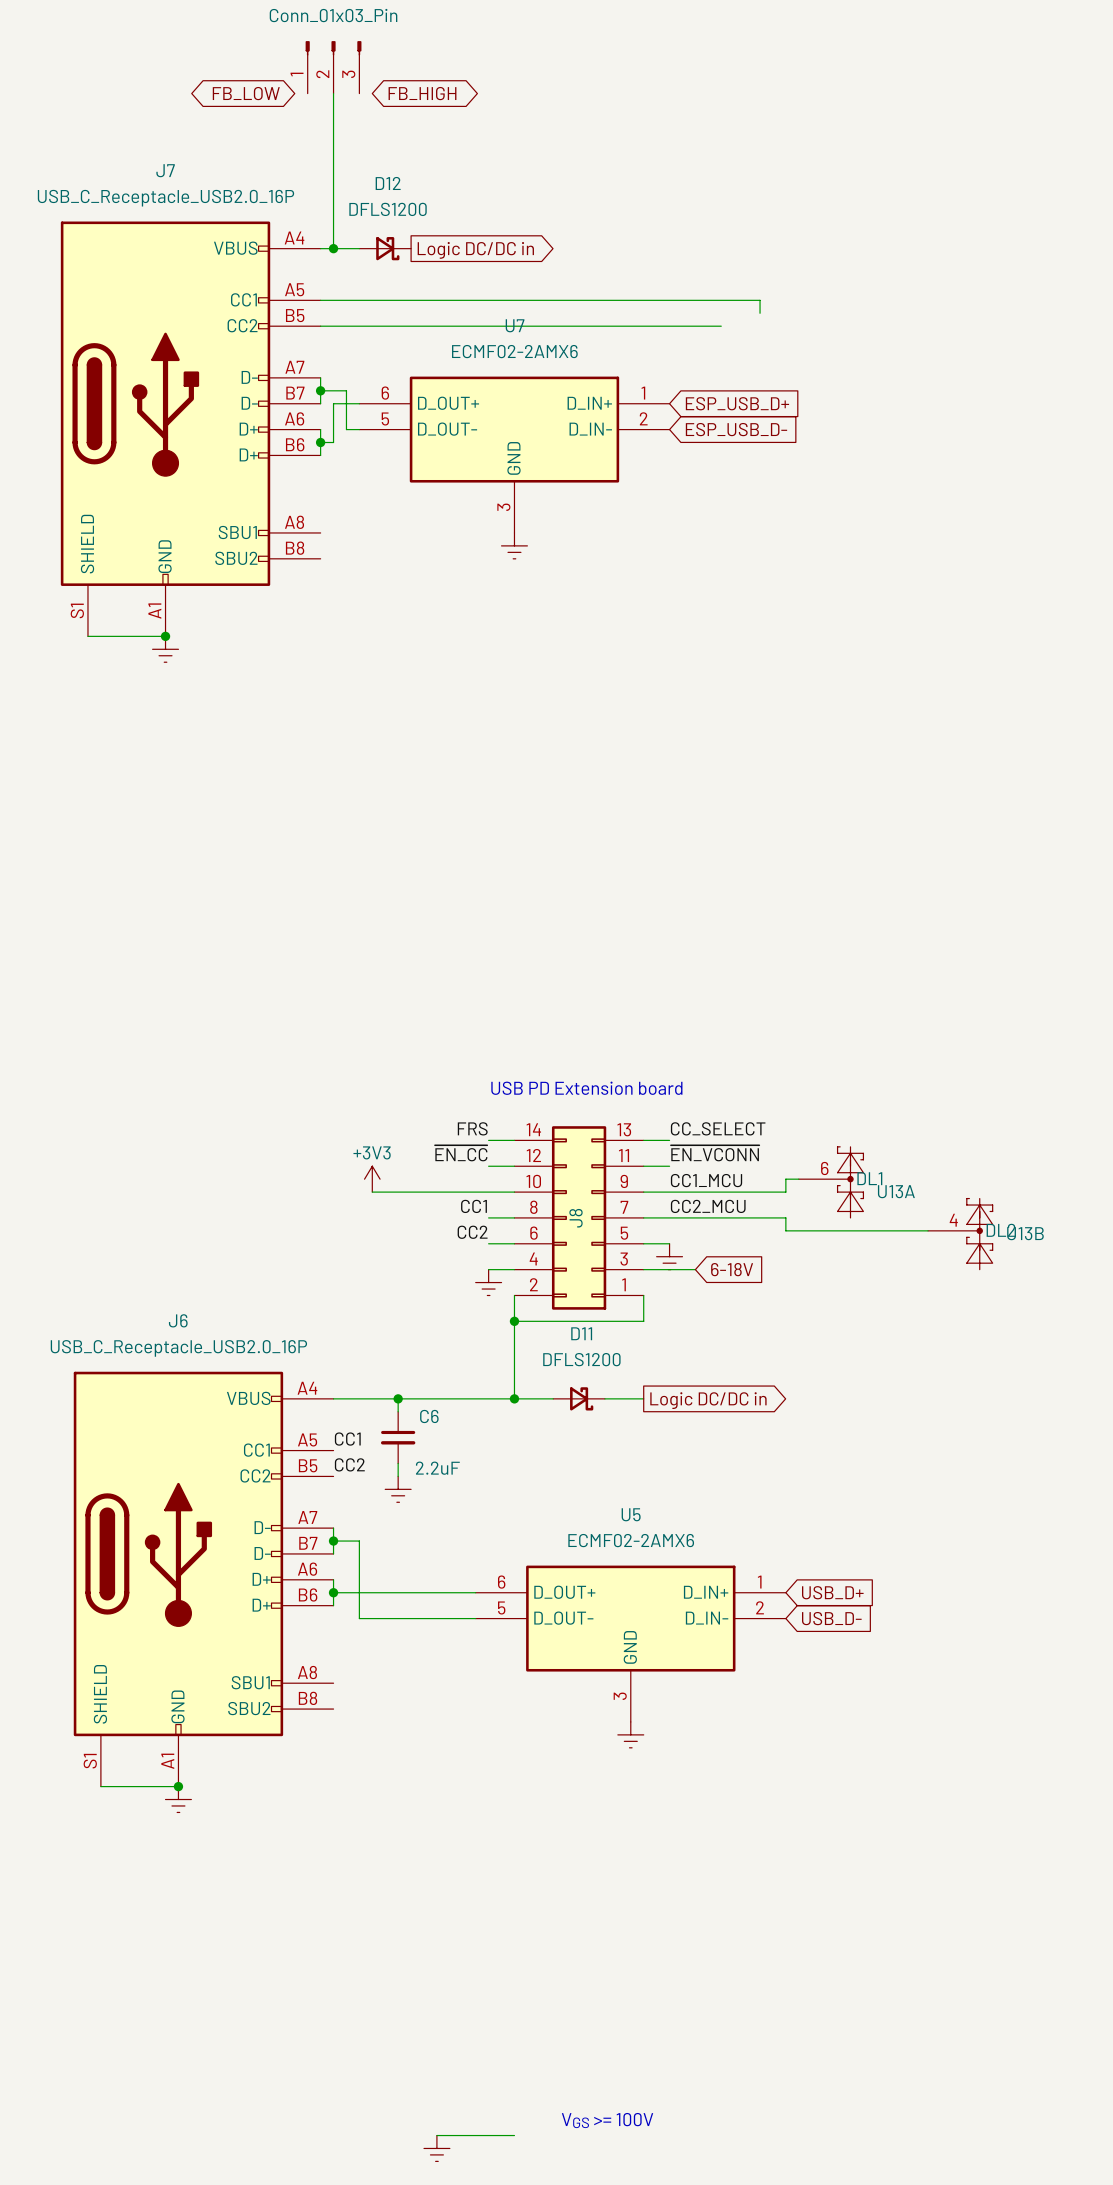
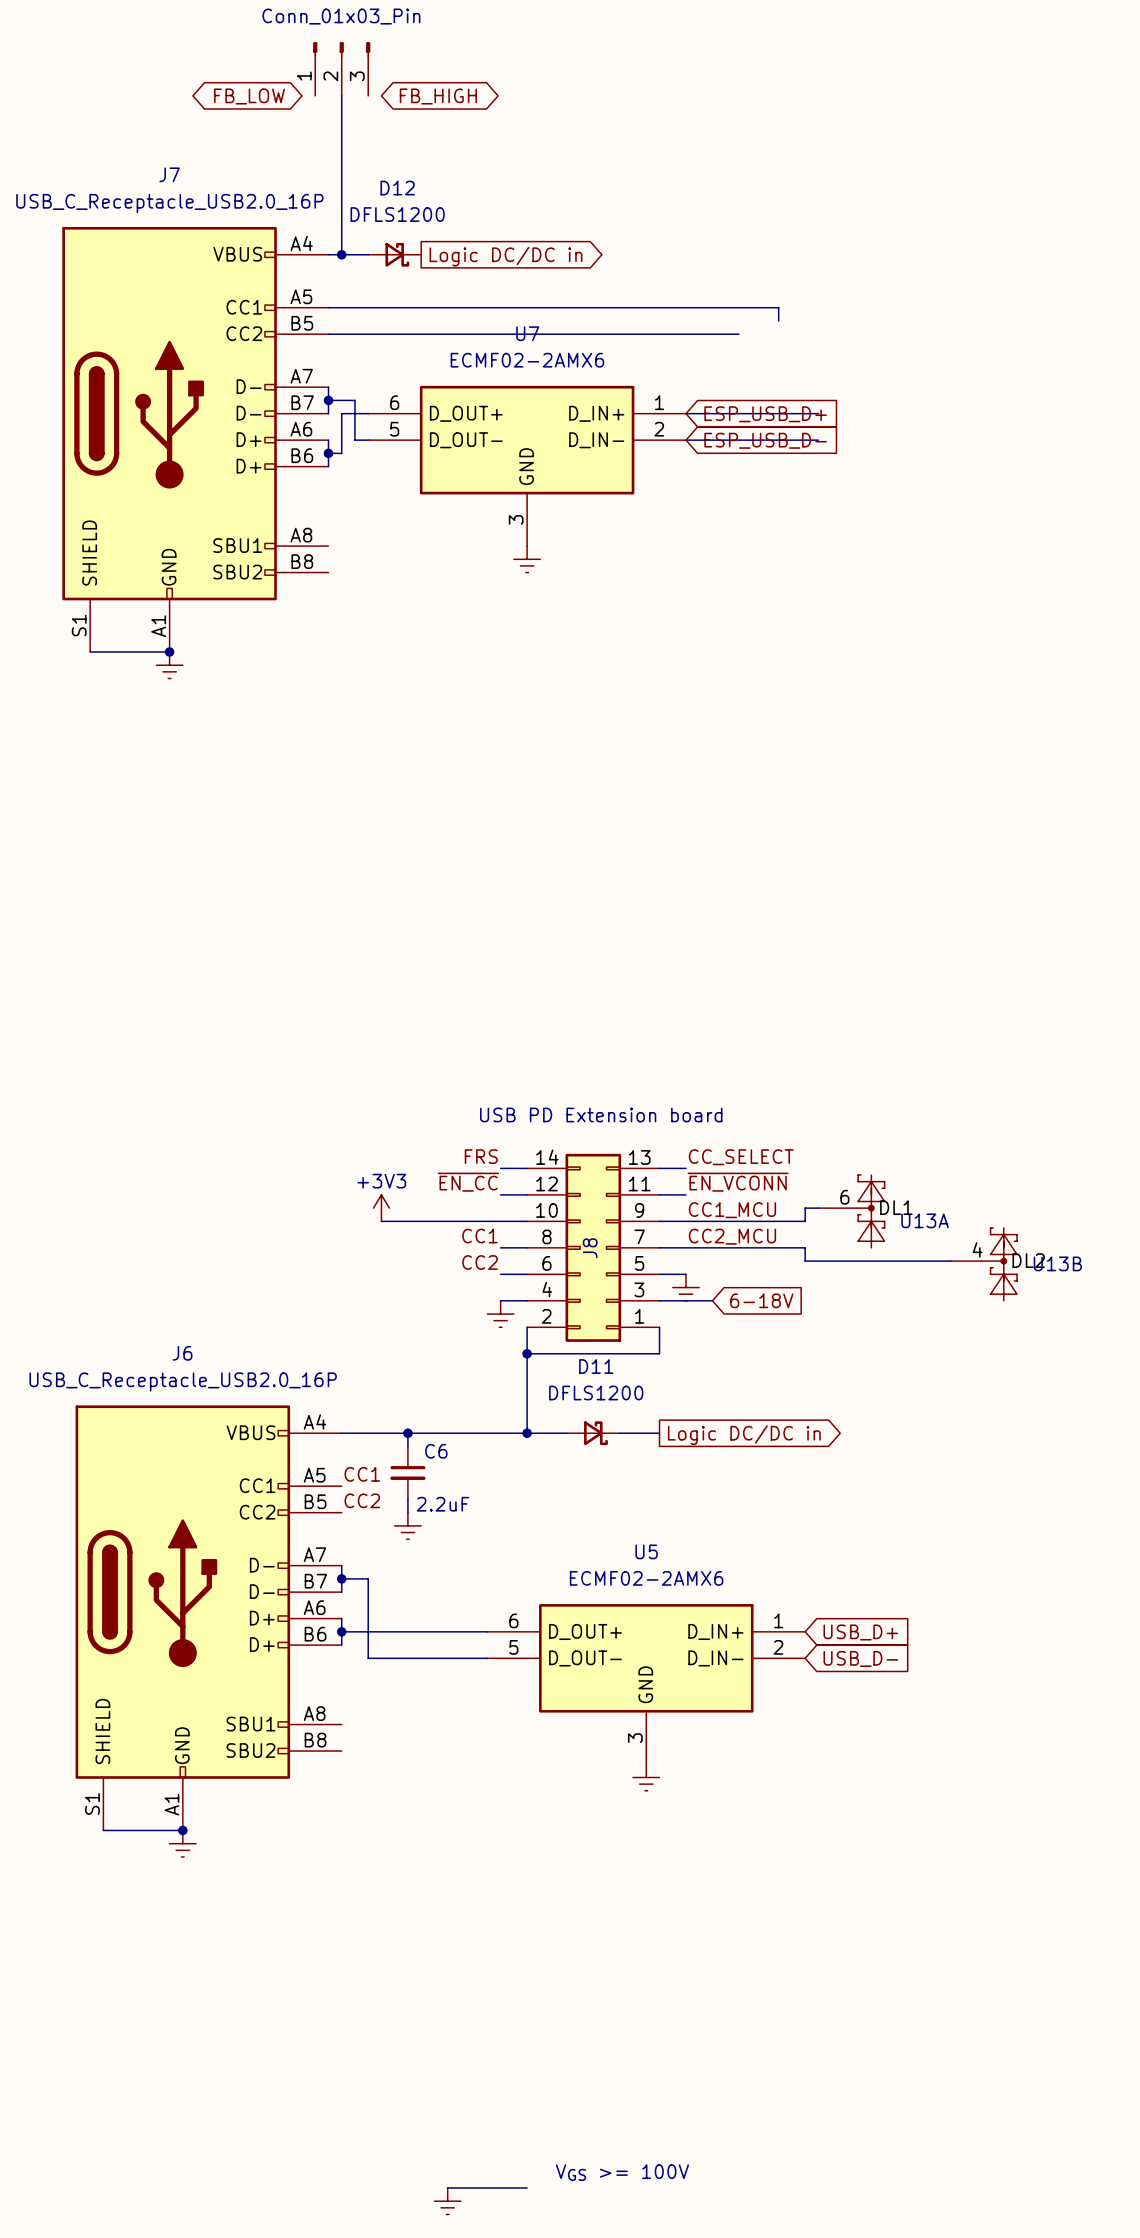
wire: none -> (686, 413) (818, 413)
wire: none -> (686, 440) (818, 440)

